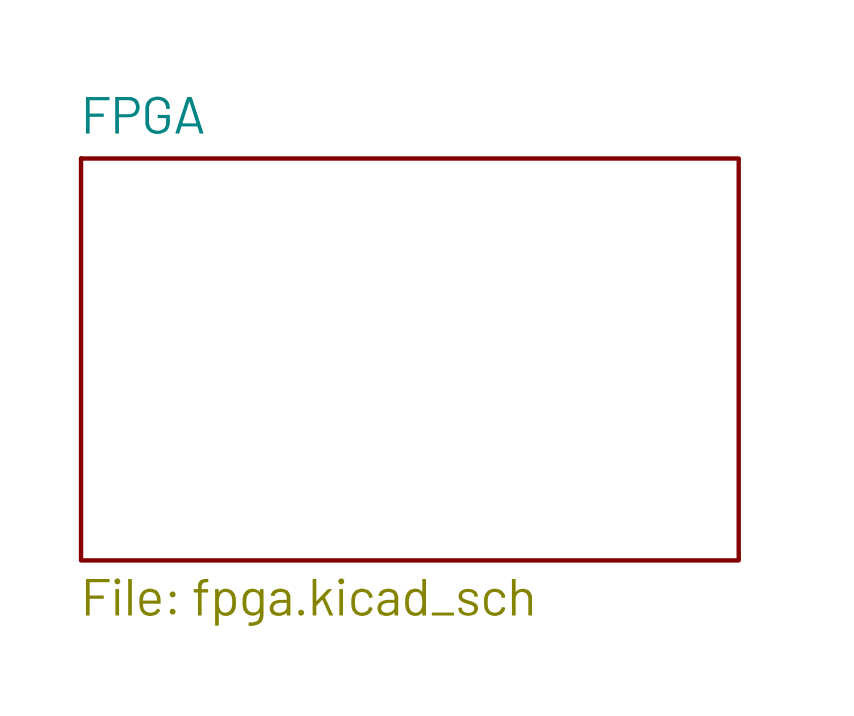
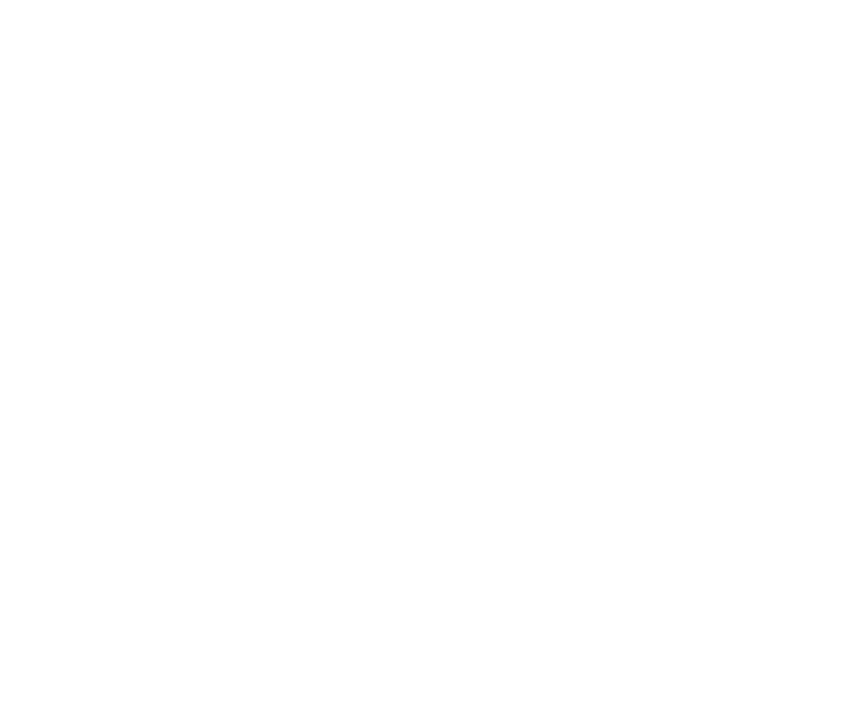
sheet FPGA: File: fpga.kicad_sch (409, 359) -> none

